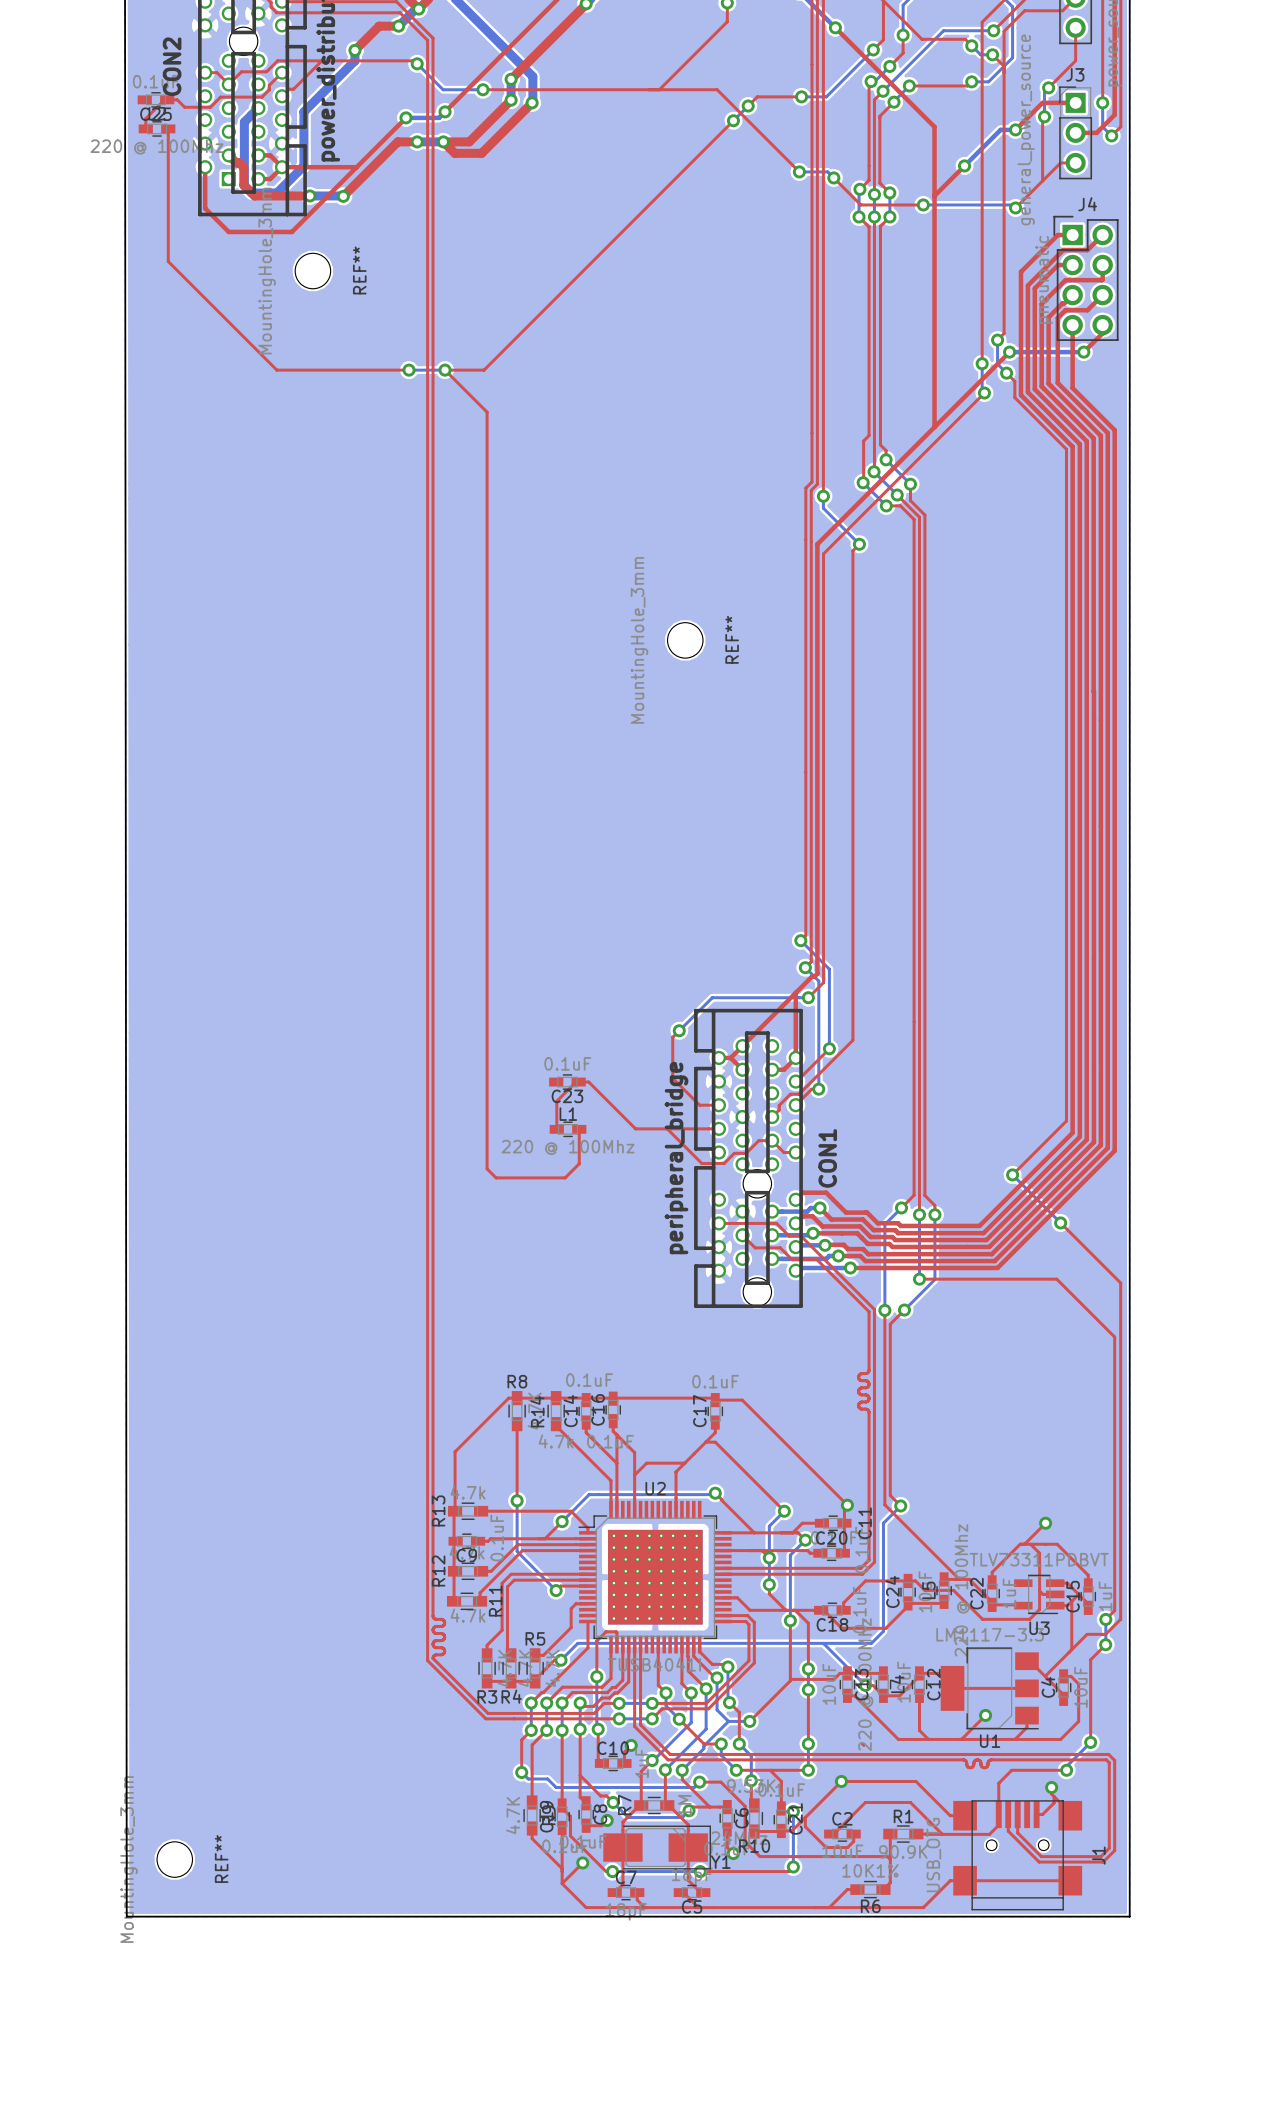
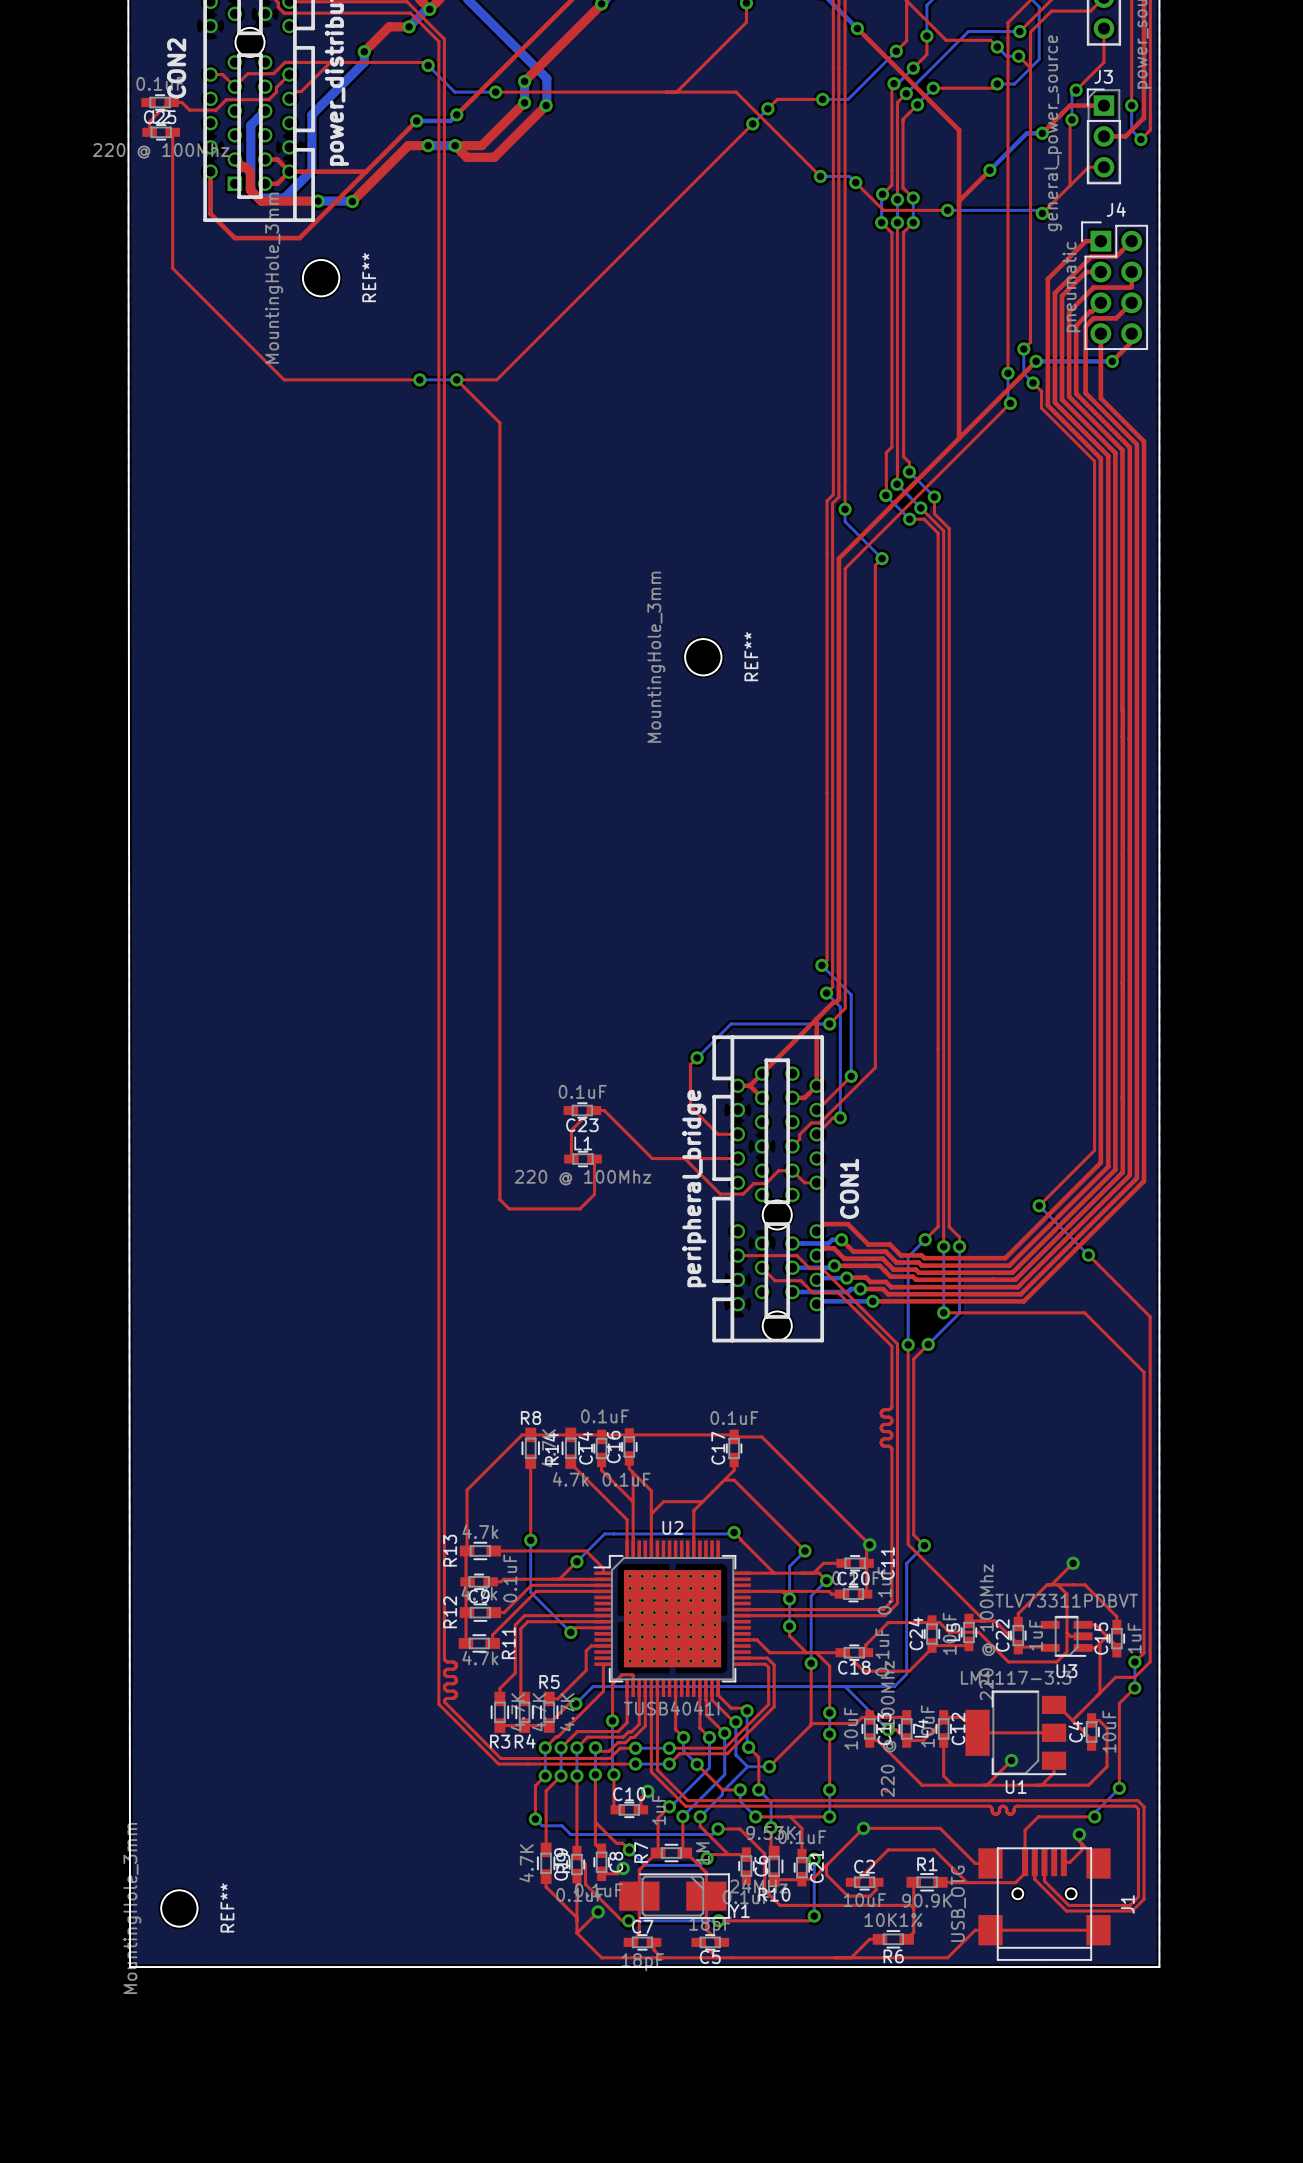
top track: (727, 1829) (727, 1847) (733, 1853) -> none
via: (733, 1853) -> none

